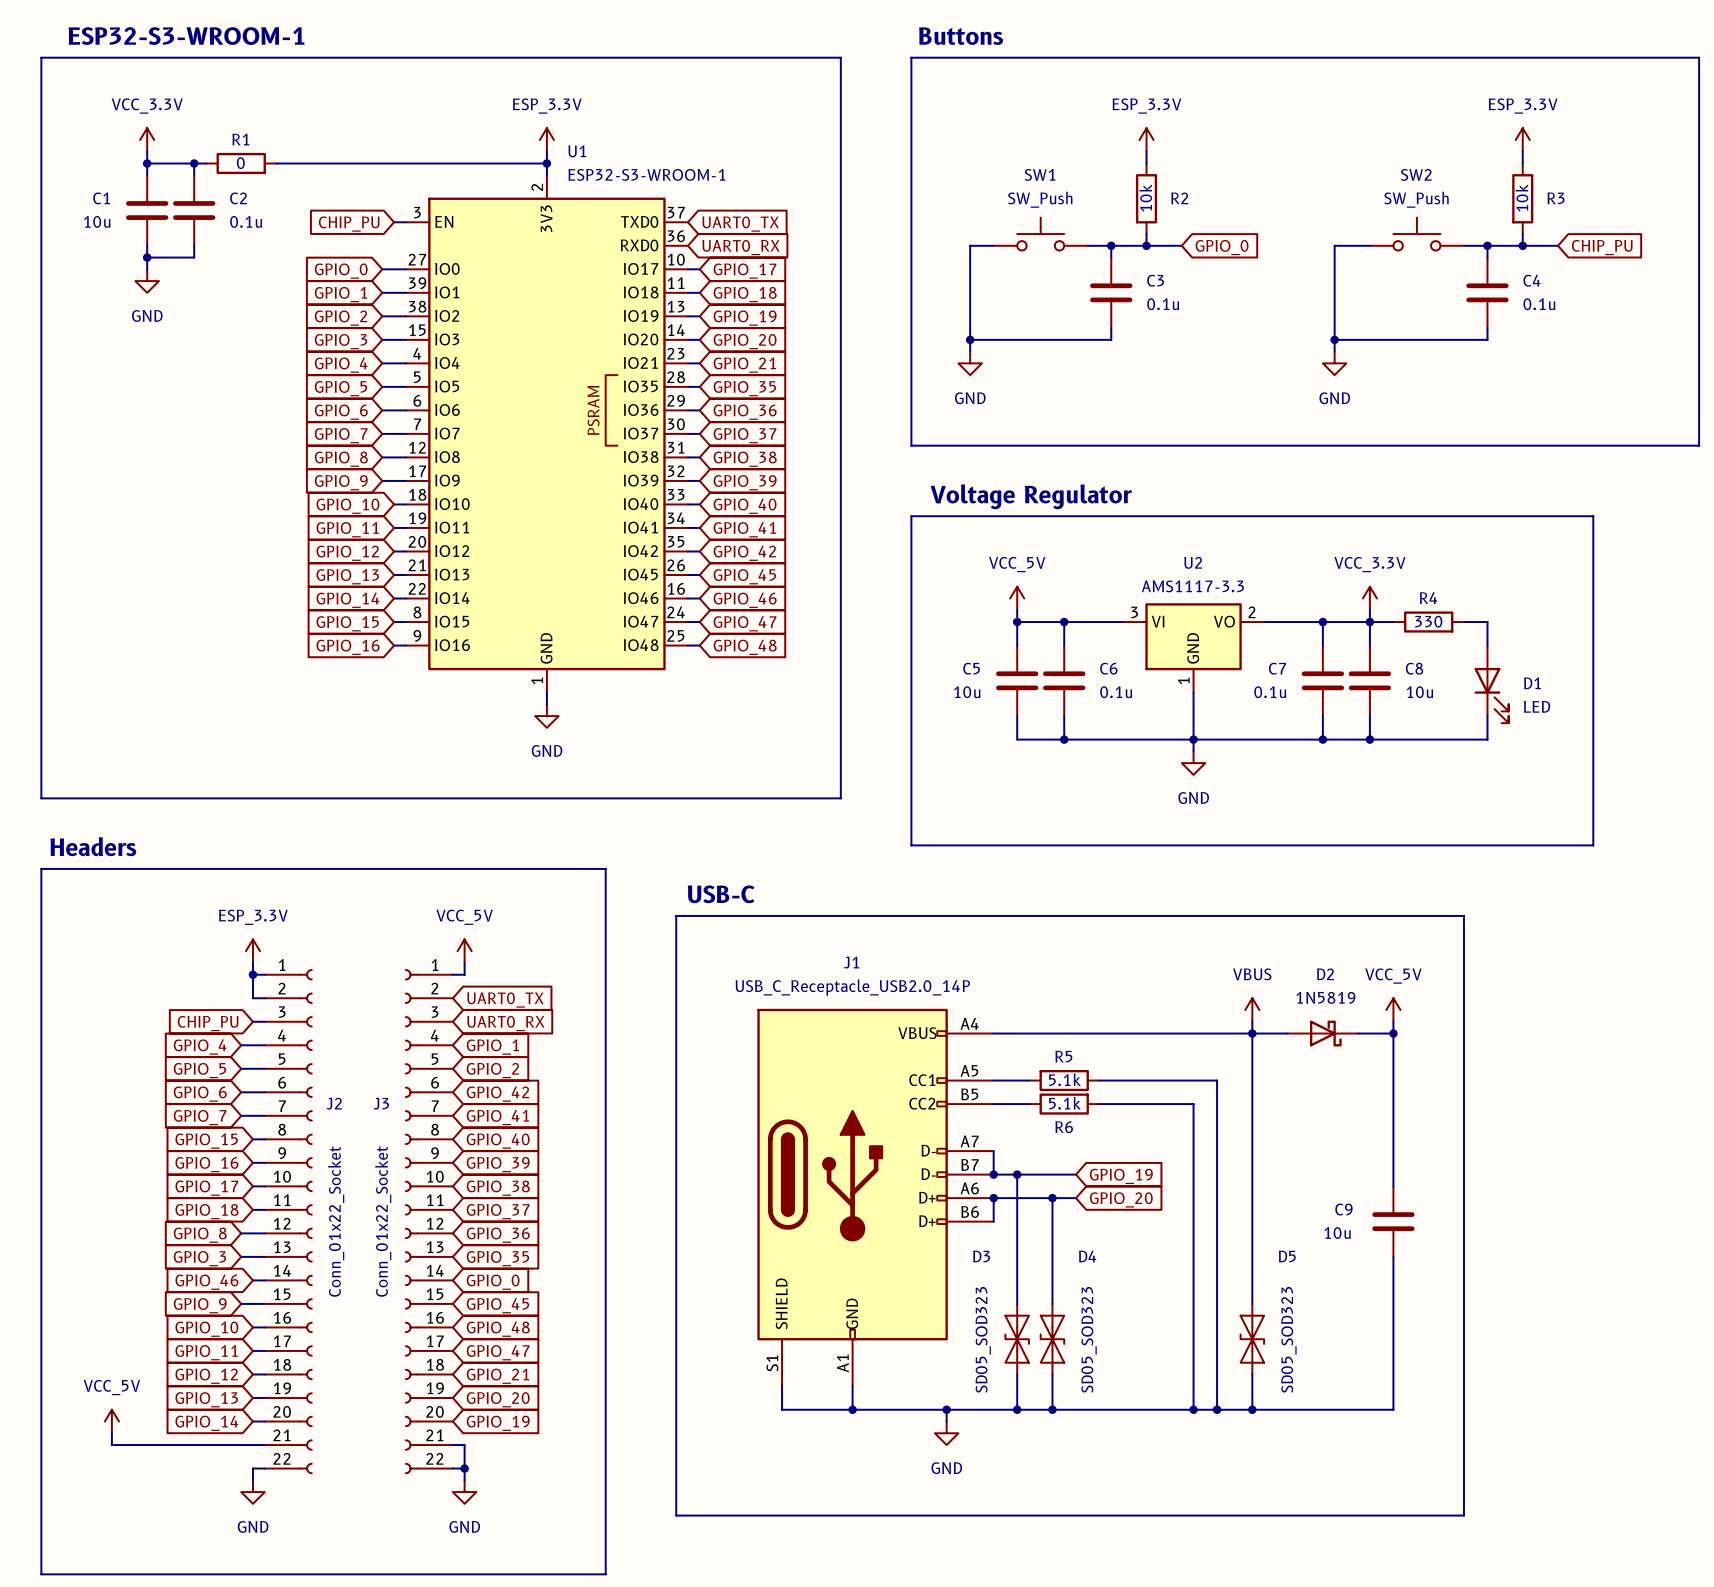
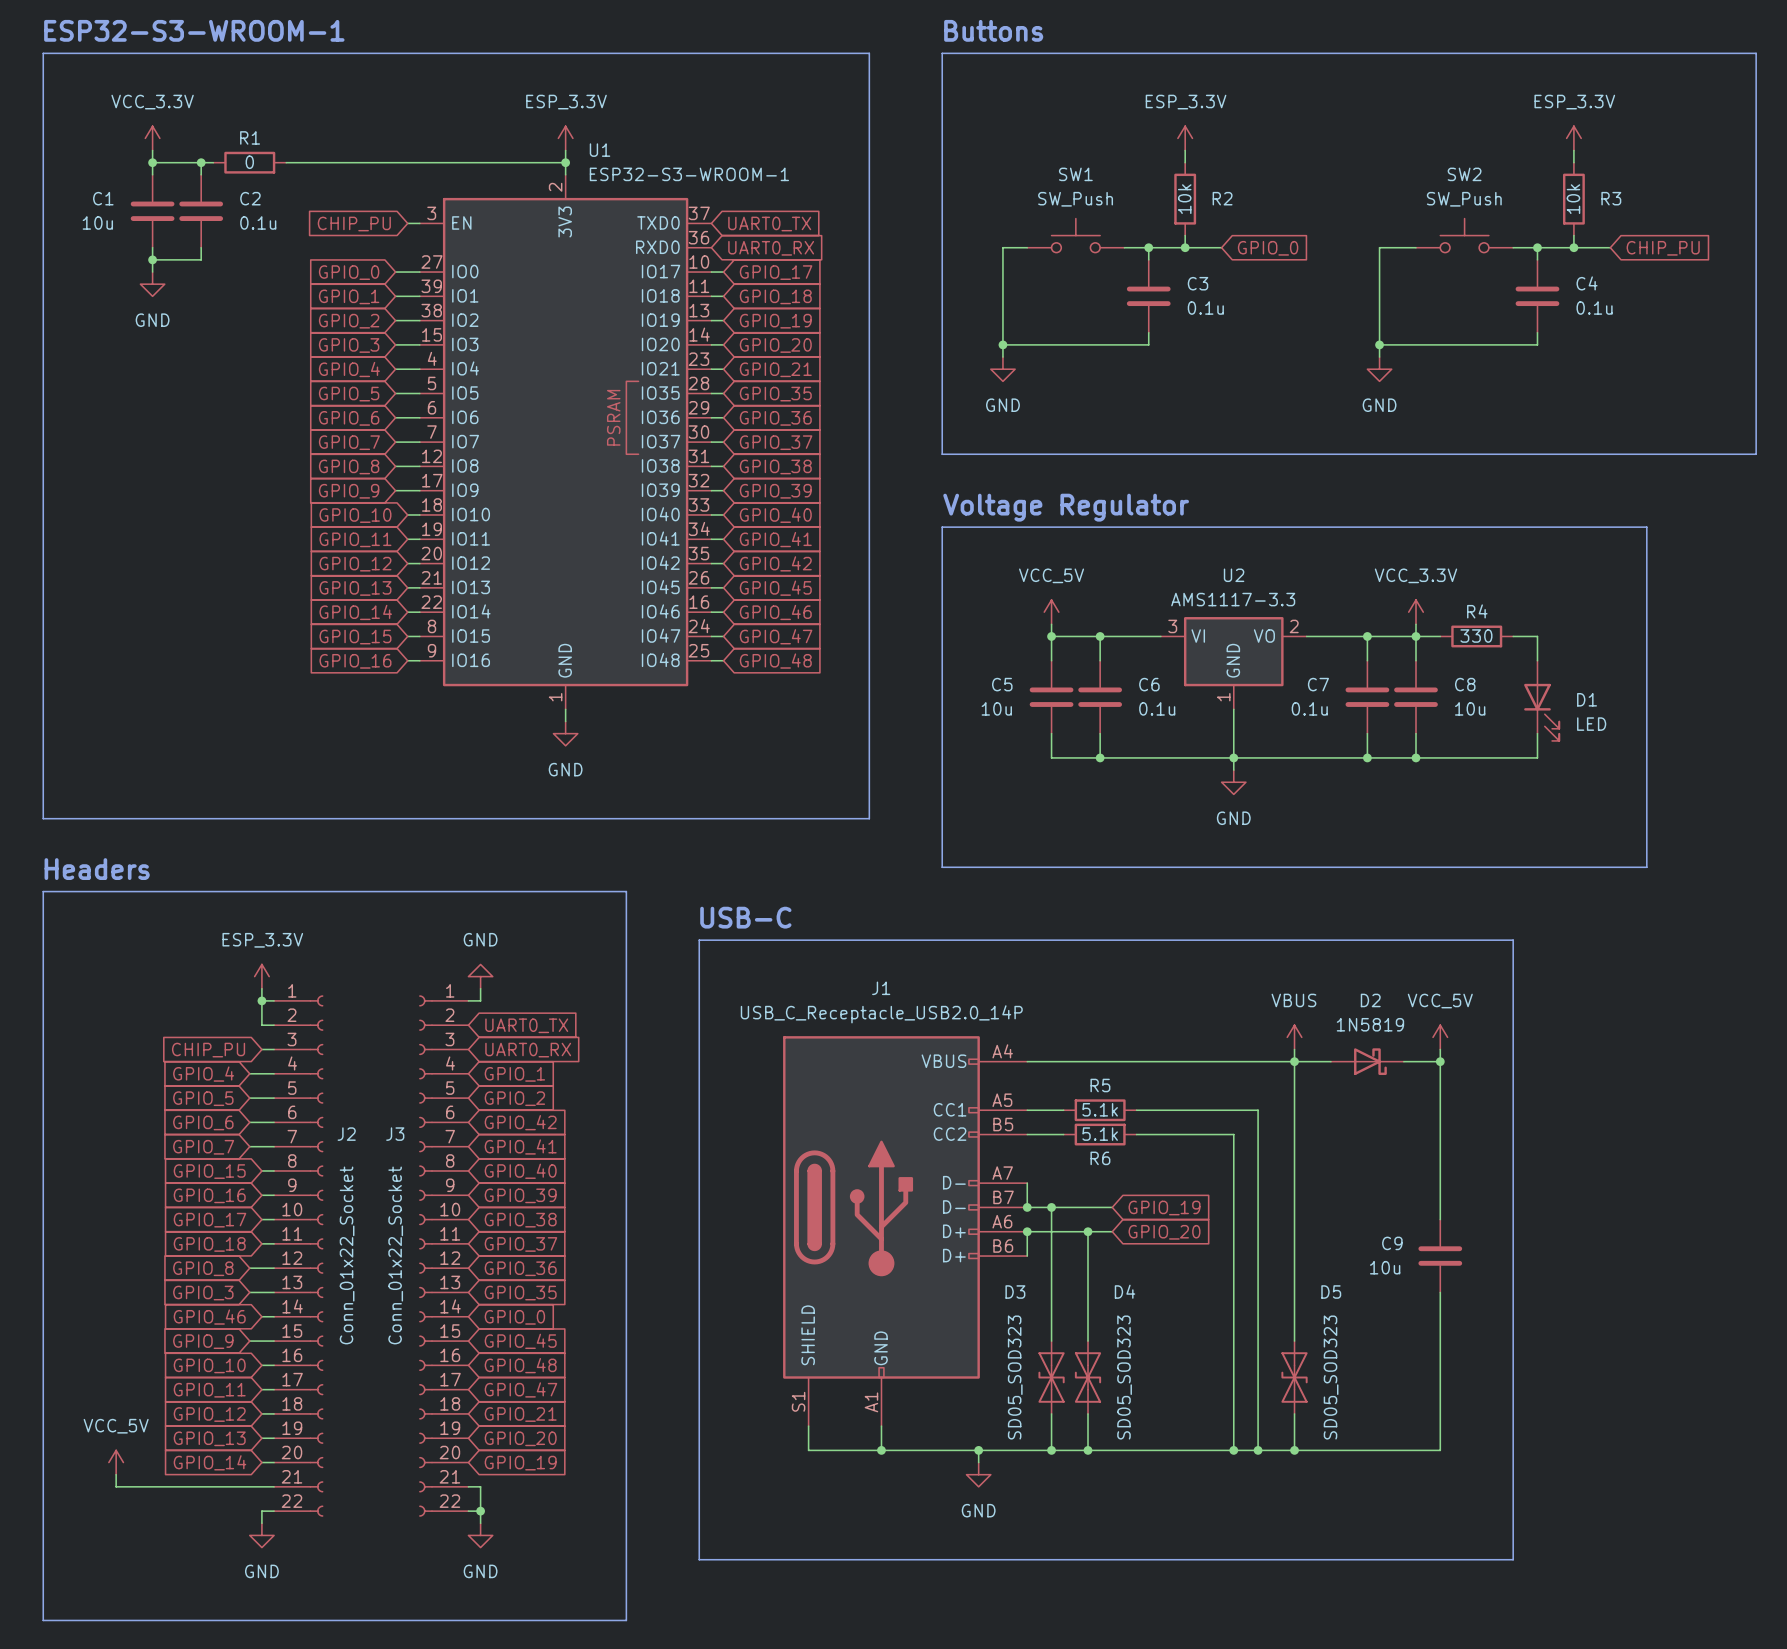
power symbol: VCC_5V (464, 951) -> GND (480, 976)

